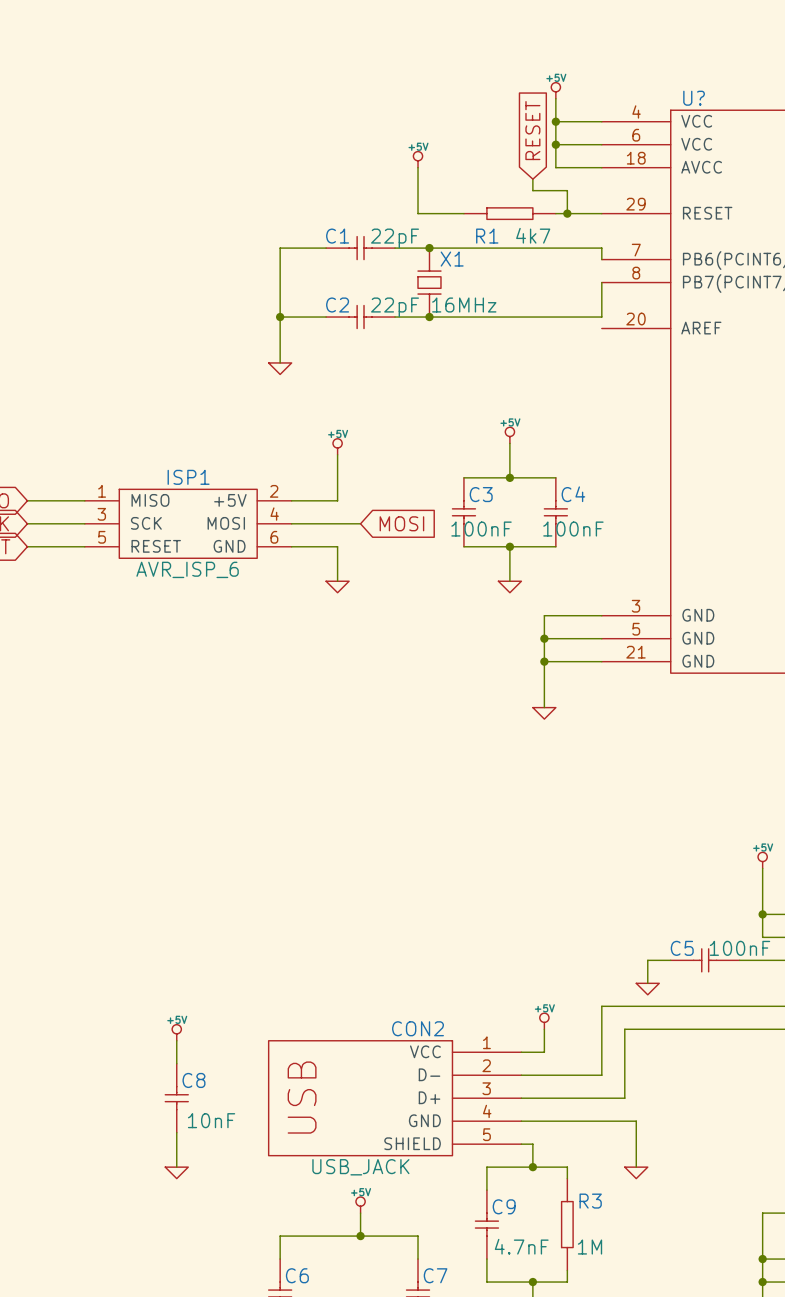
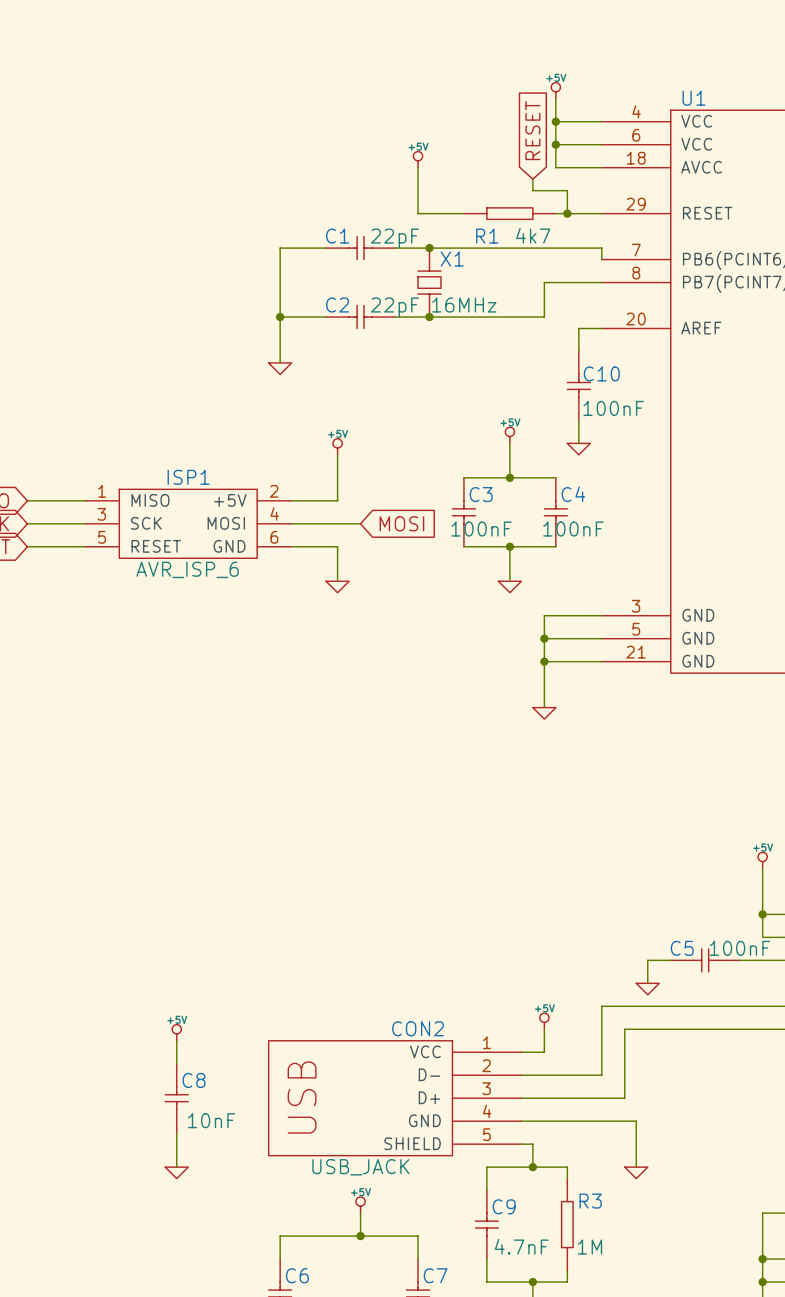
U? name: U? (694, 98) -> U1 (694, 98)
wire: (601, 282) (601, 317) (544, 317) -> (601, 282) (544, 282) (544, 317)
wire: none -> (601, 328) (578, 328) (578, 351)
C10: none -> (578, 385)
wire: none -> (578, 420) (578, 443)
power symbol: none -> (578, 449)

